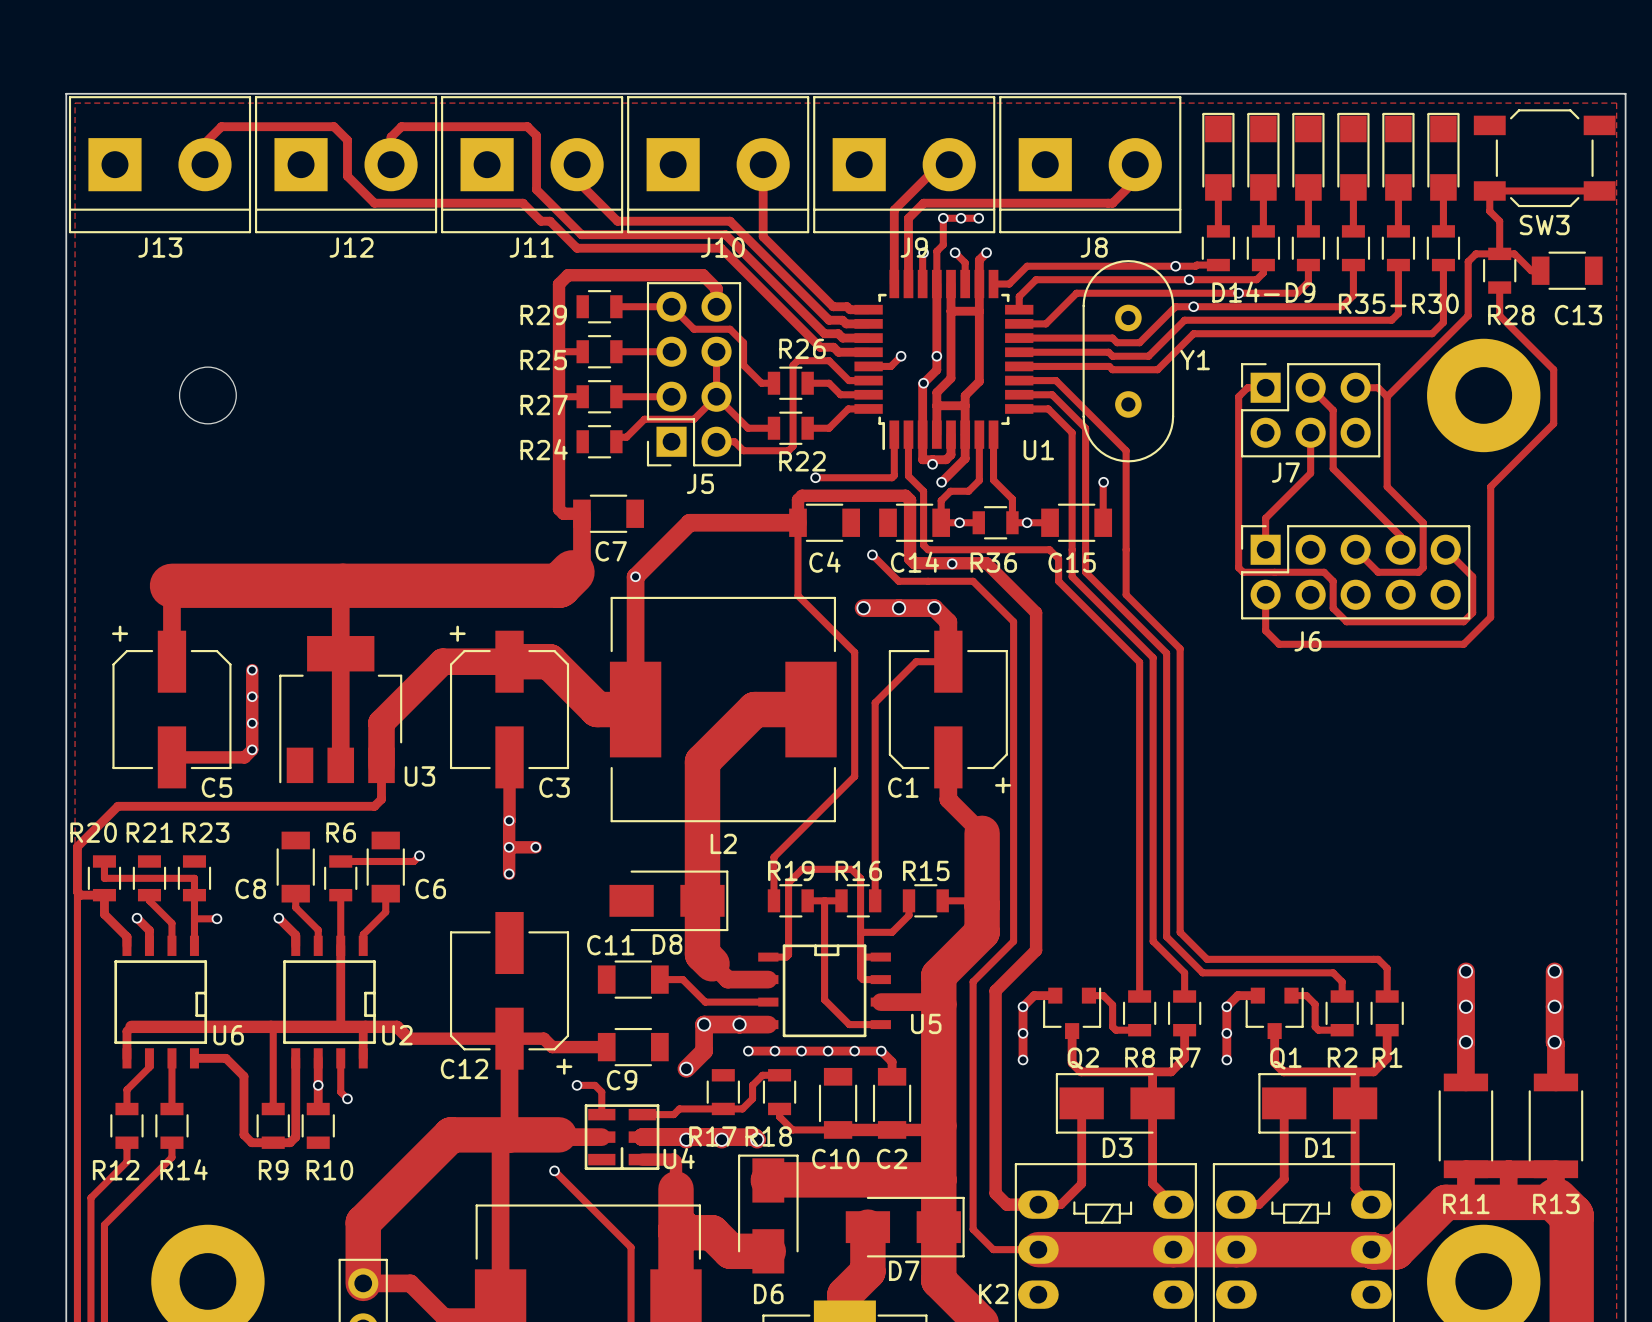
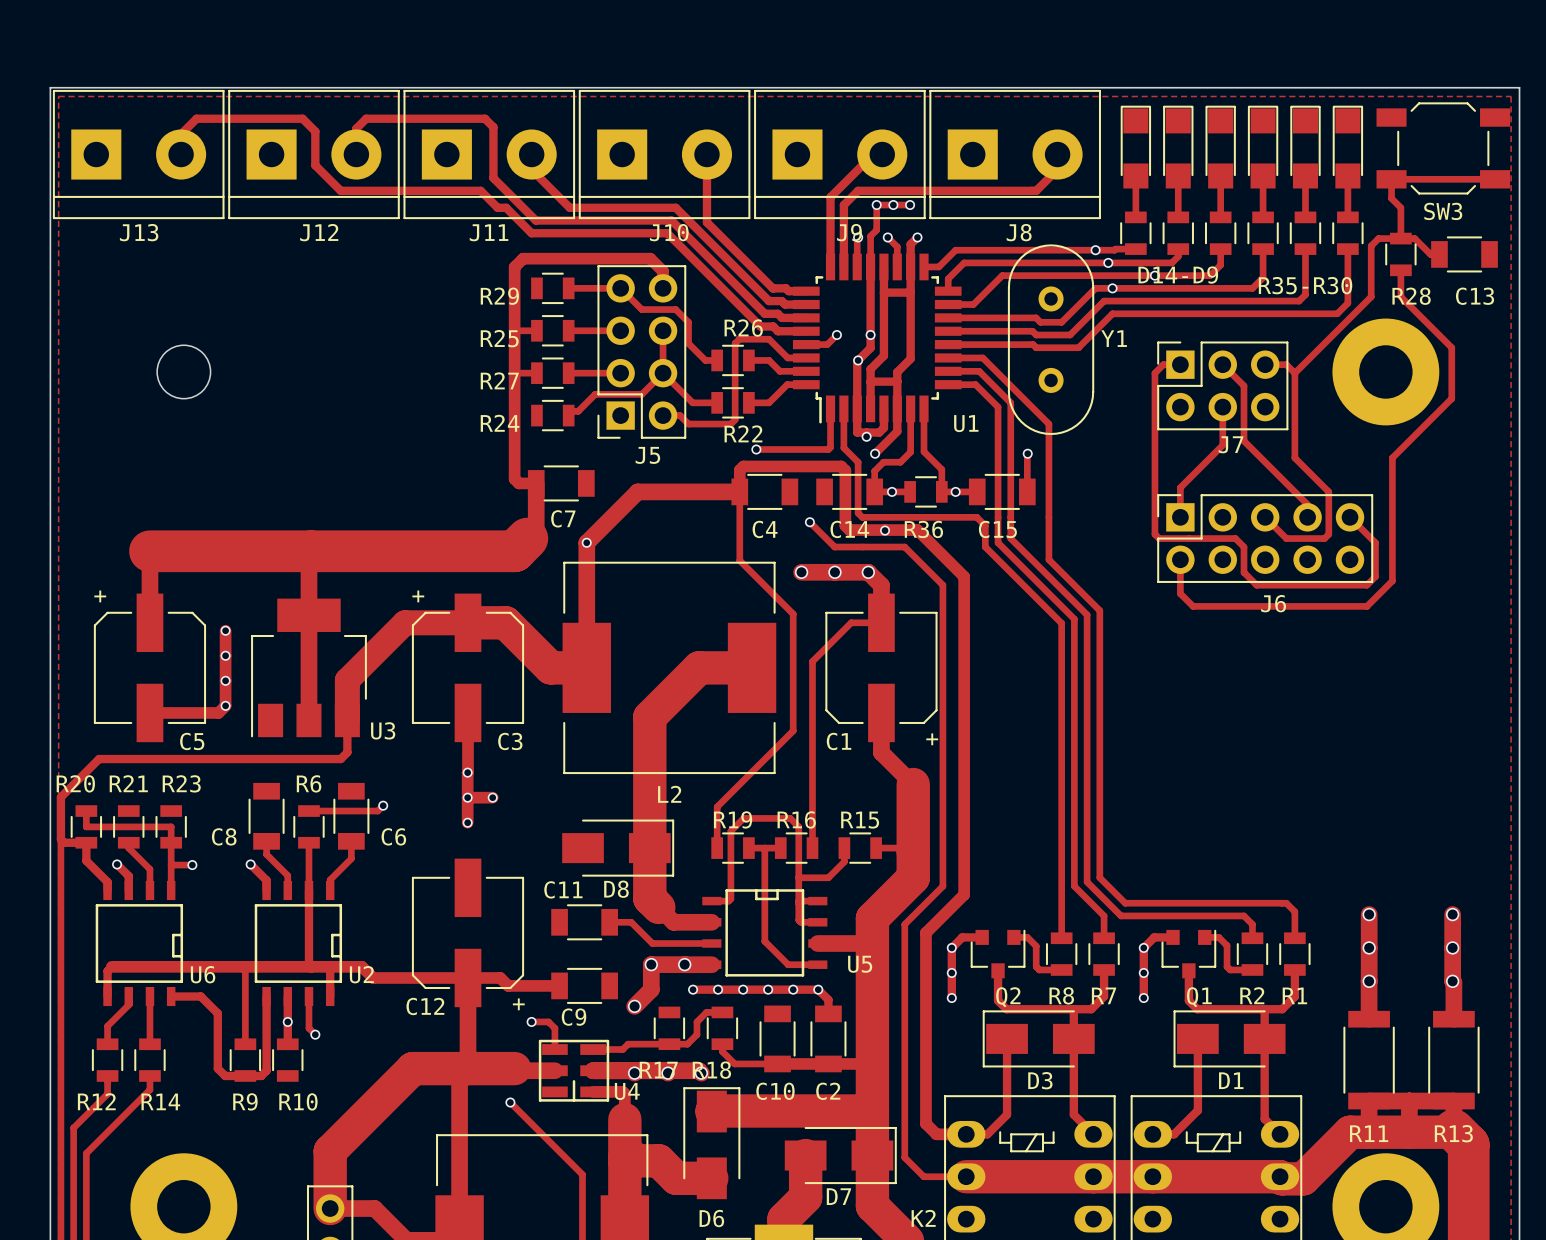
J7 name position: J7 (1285, 472) -> J7 (1231, 444)
J6 name position: J6 (1307, 641) -> J6 (1273, 603)

